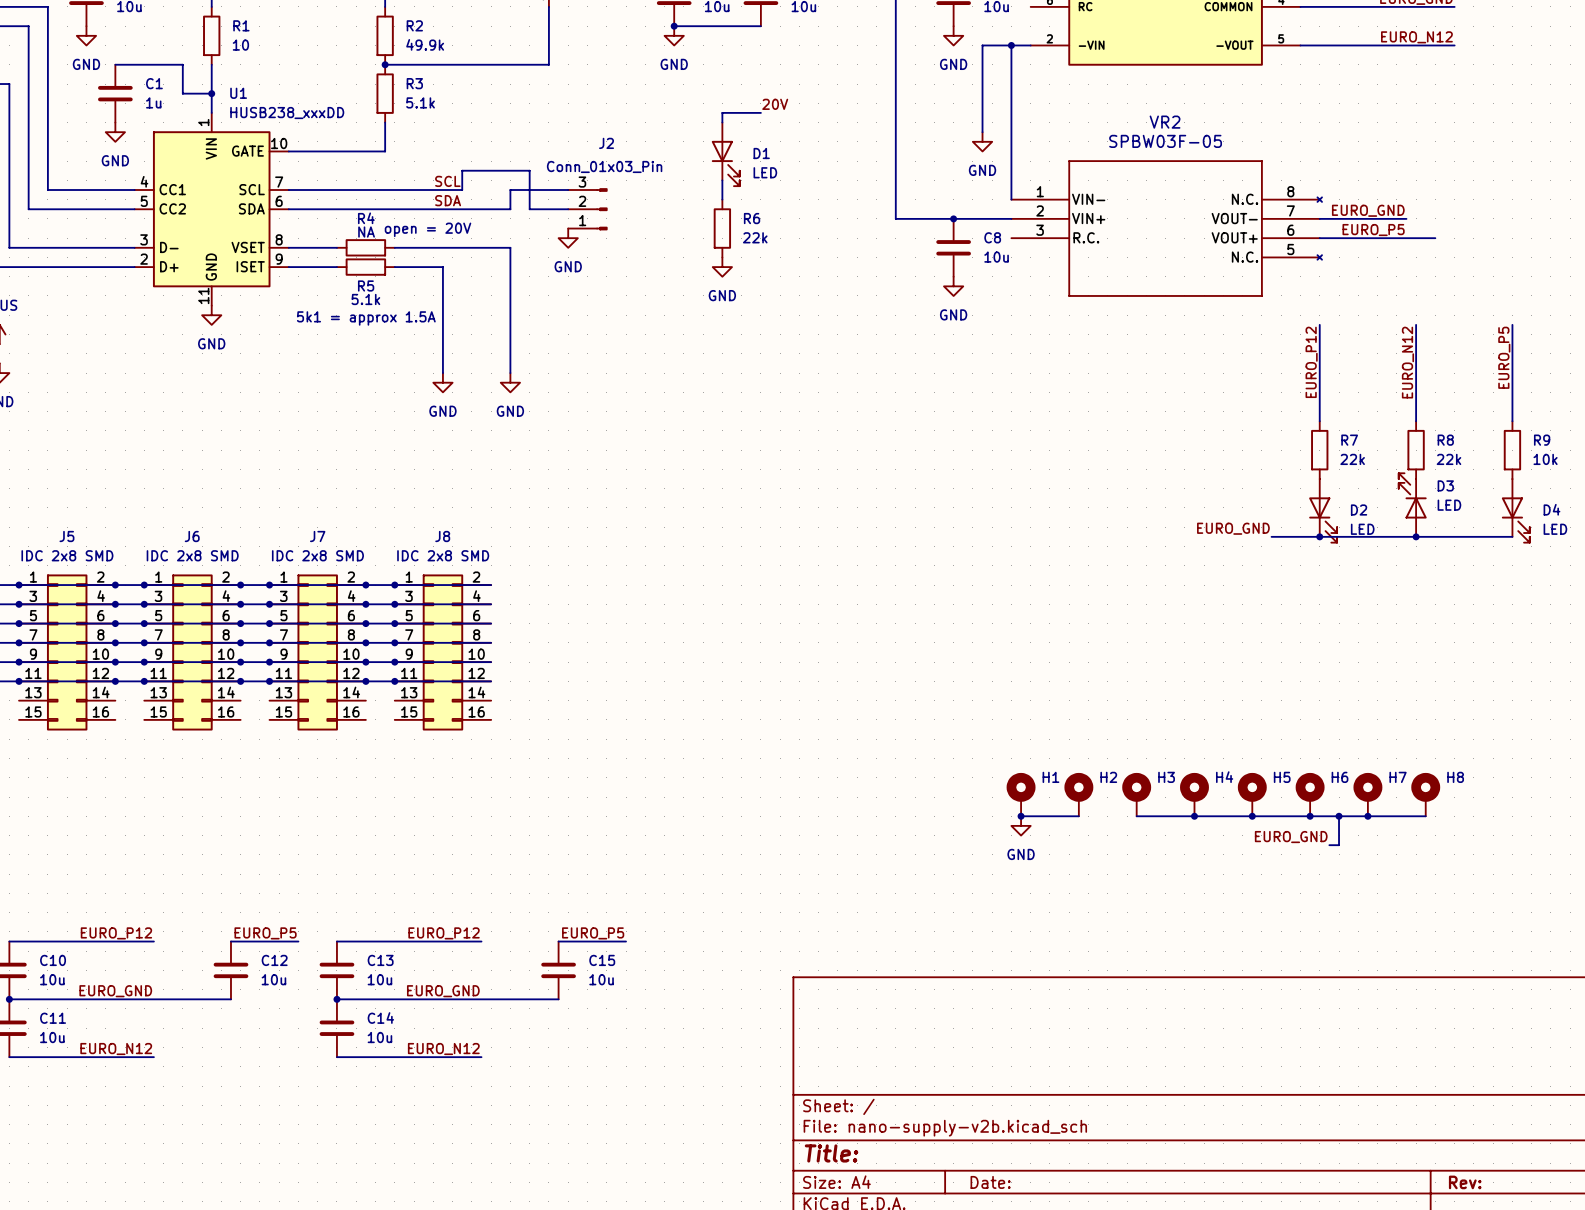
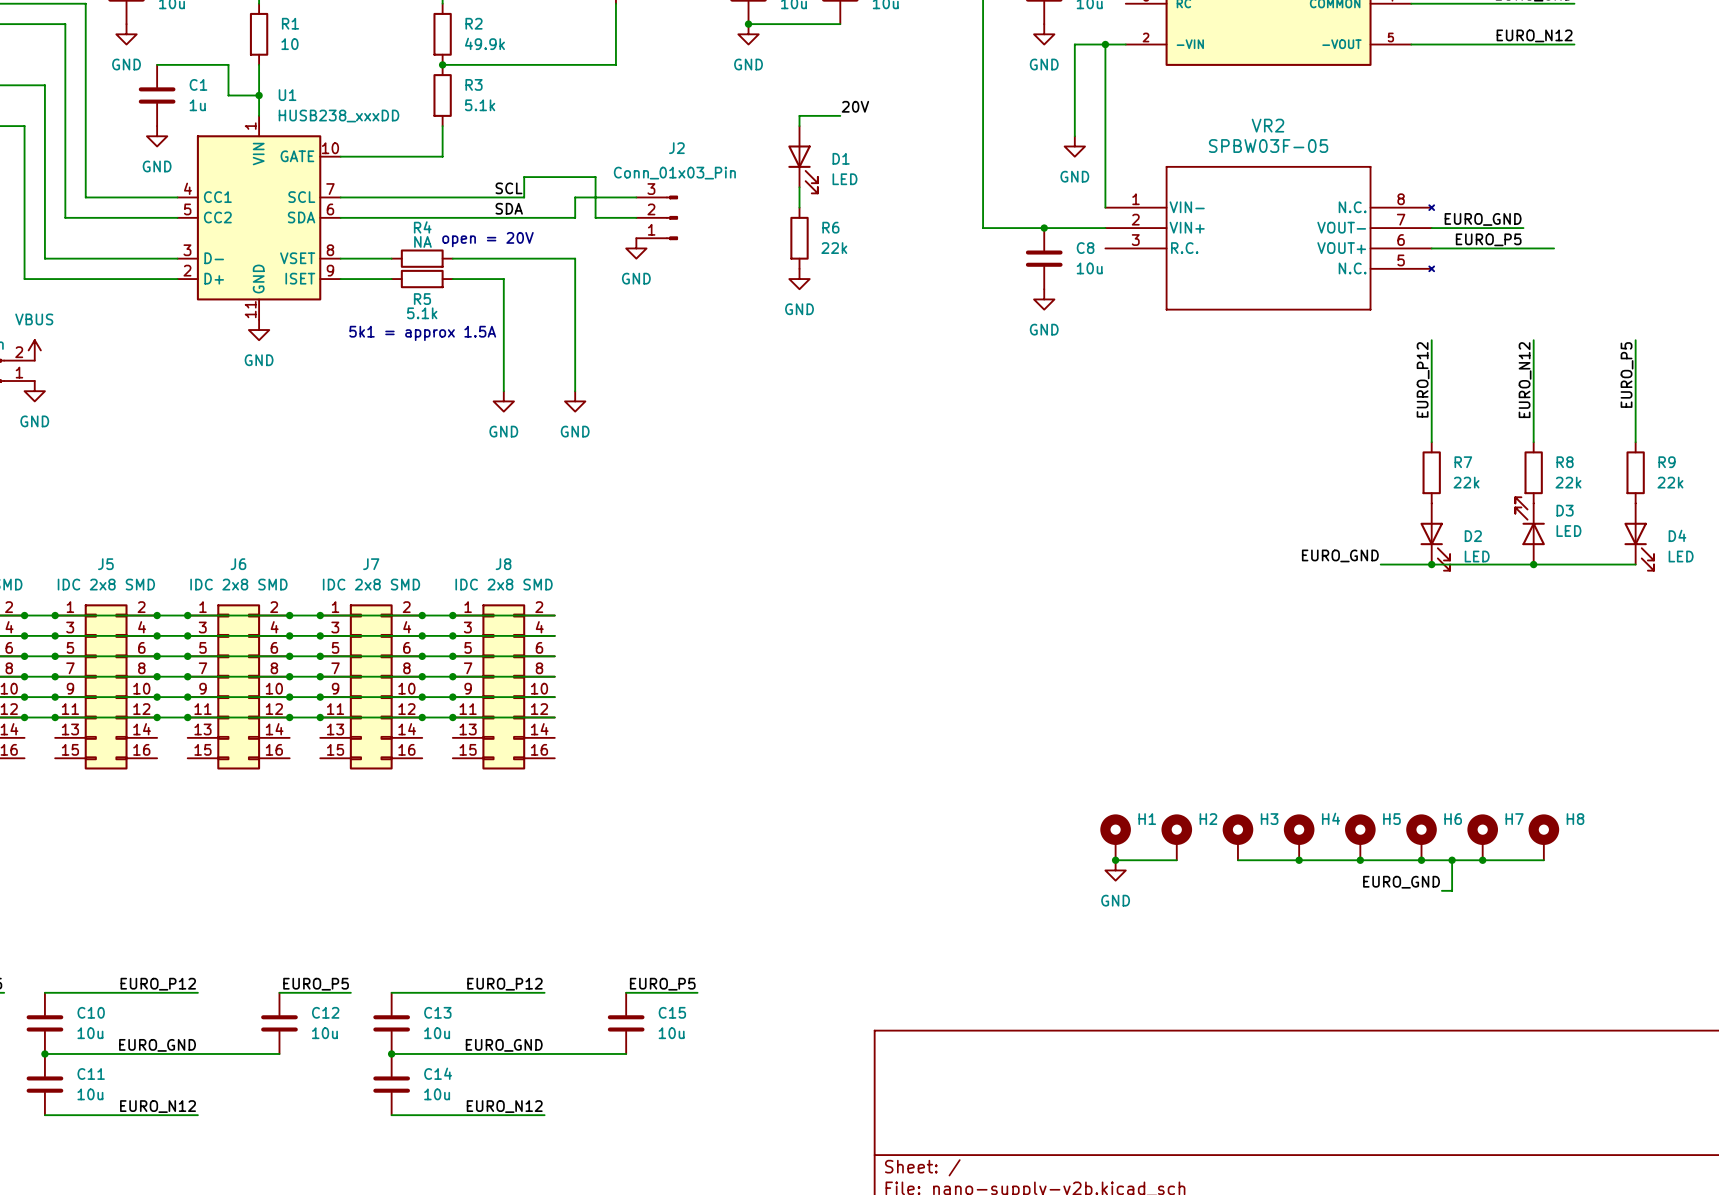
R9 value: 10k (1545, 459) -> 22k (1670, 482)

